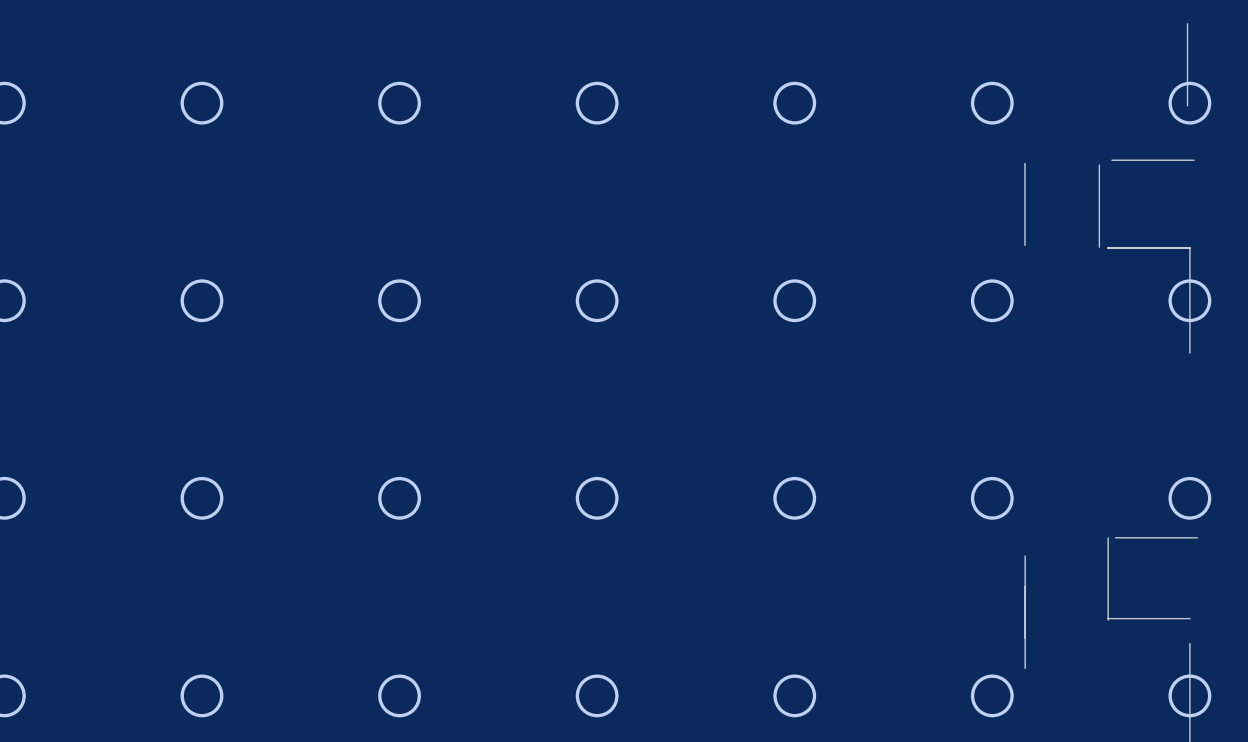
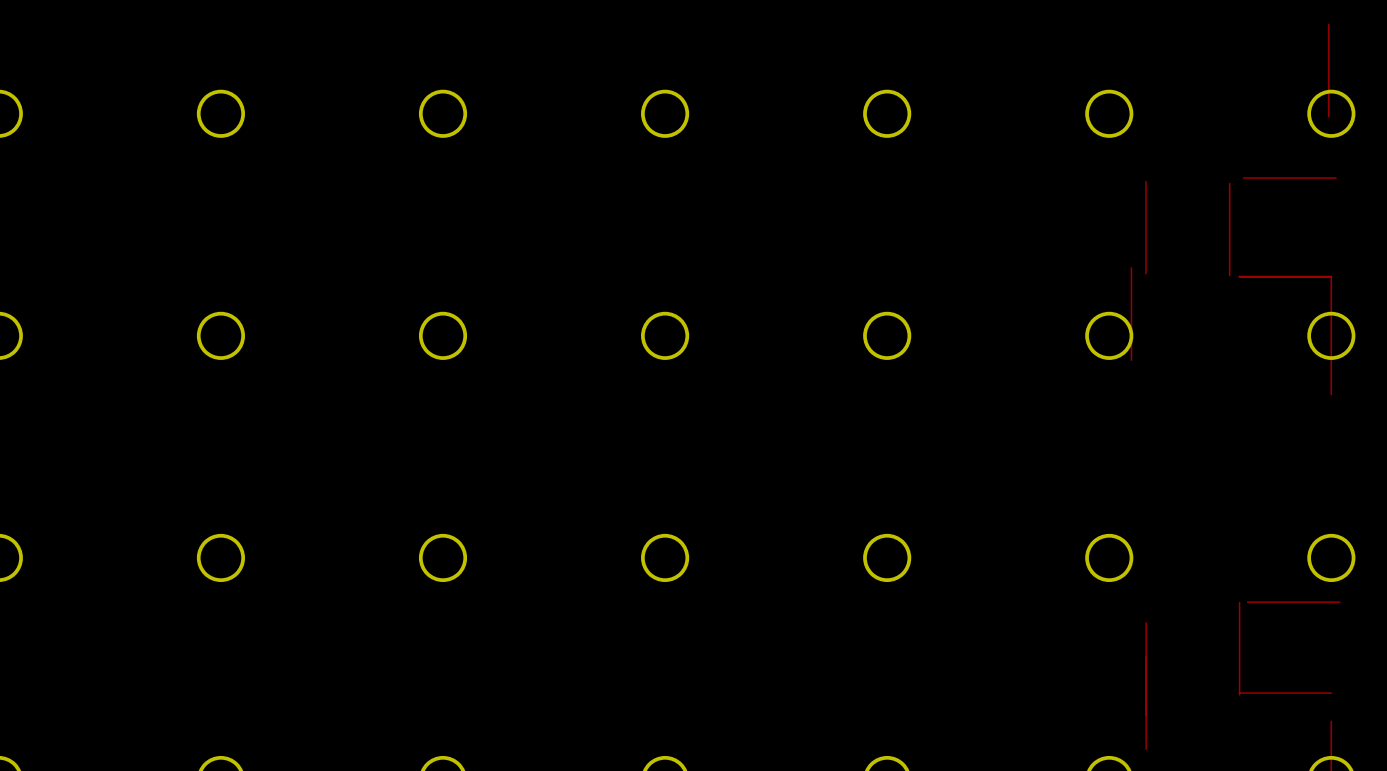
part: none -> (1131, 314)

